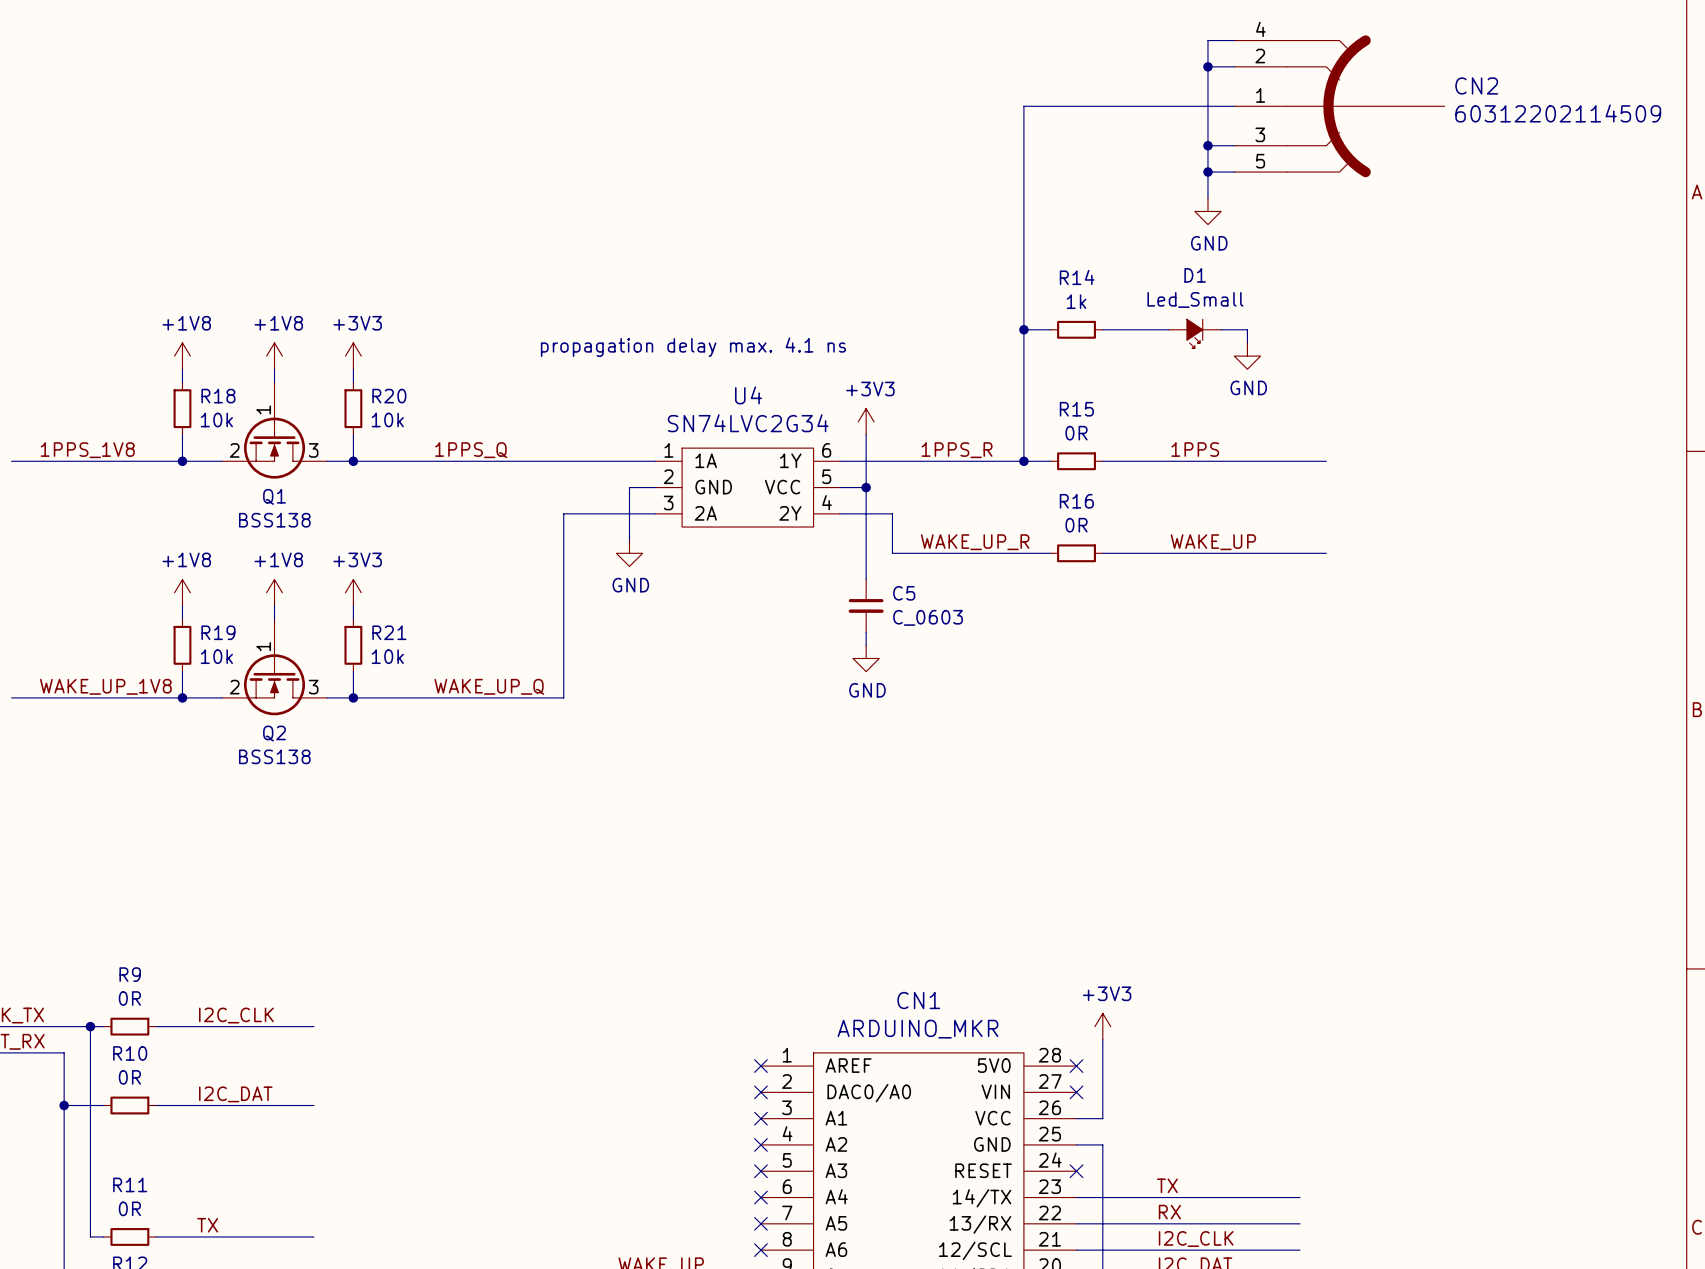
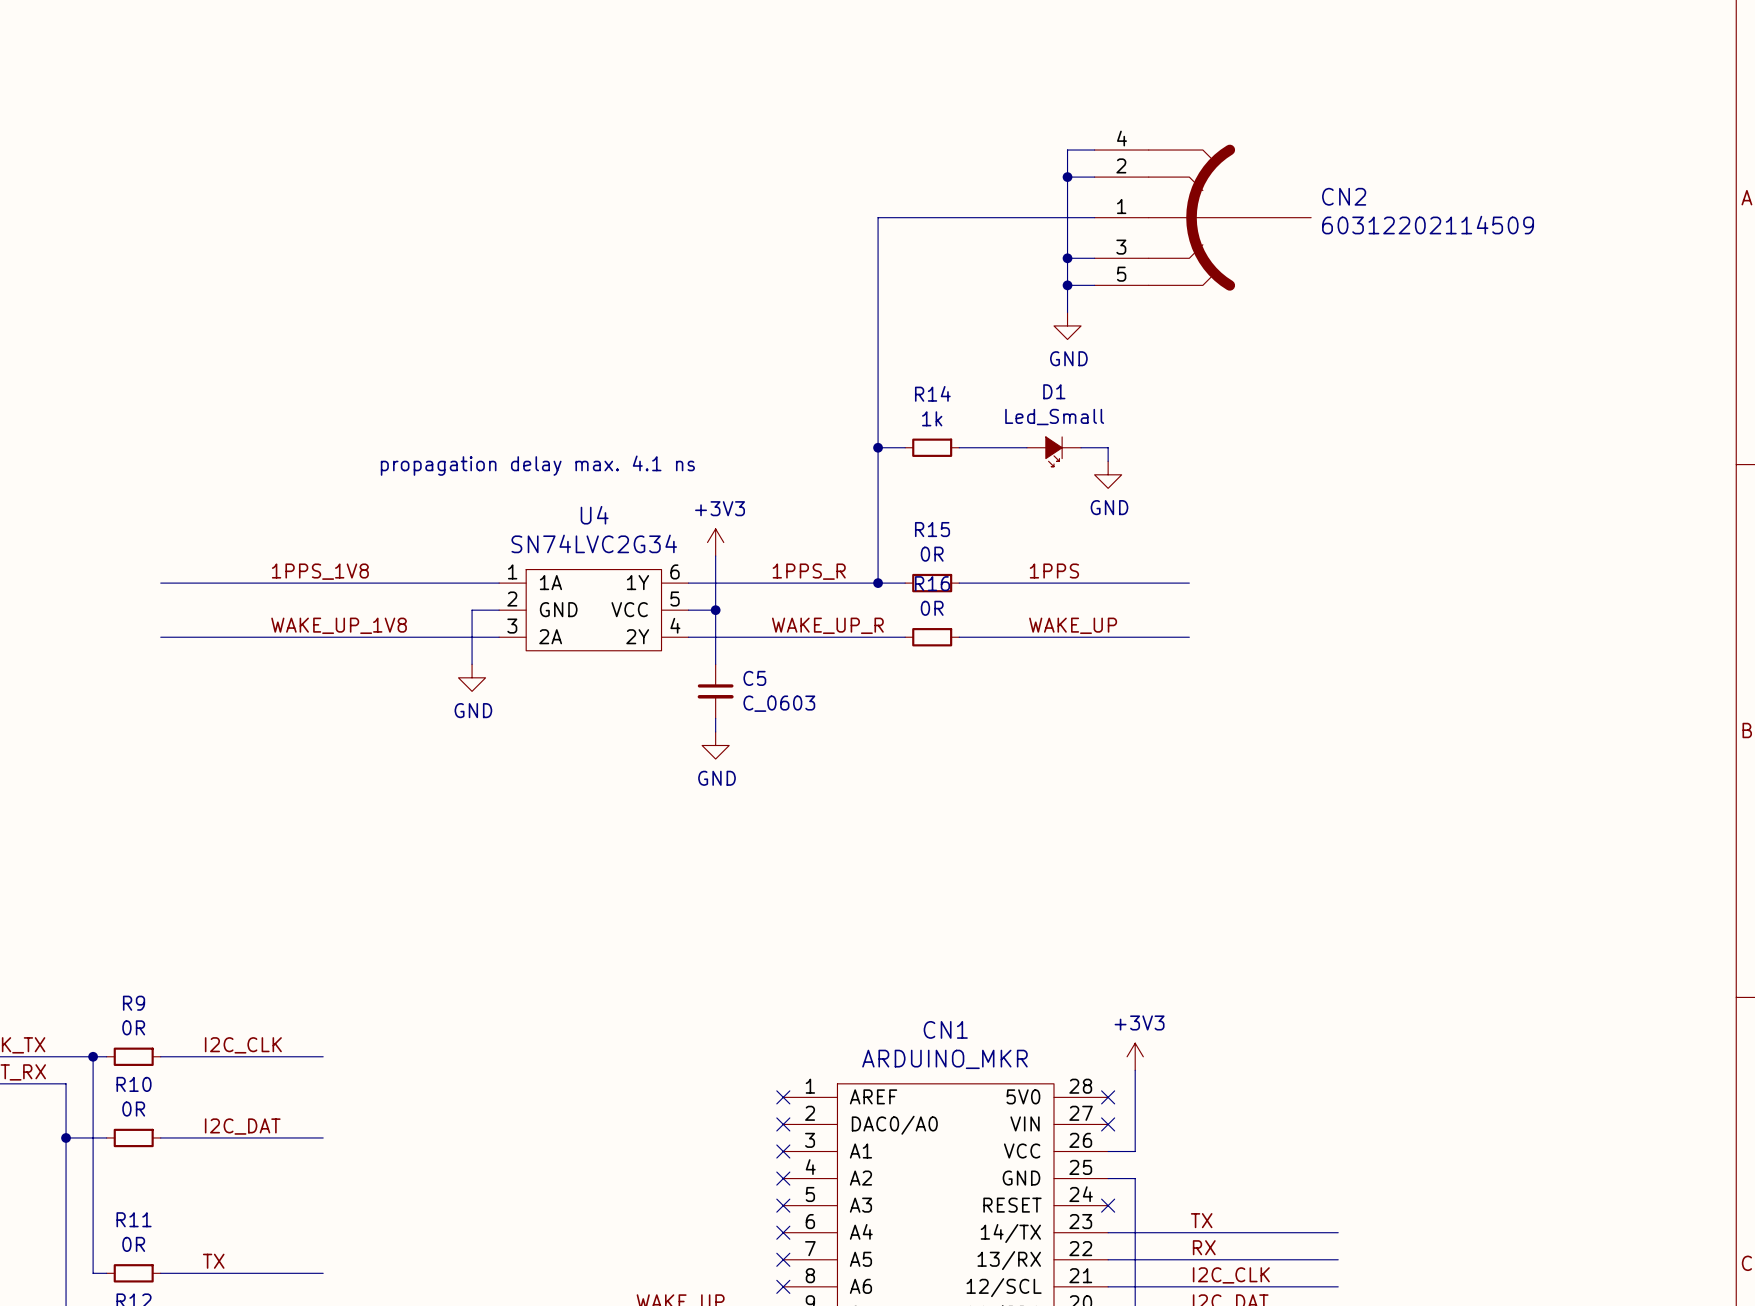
wire: (1234, 40) (1207, 40) (1207, 198) -> (1094, 150) (1067, 150) (1067, 312)
wire: (1207, 66) (1234, 66) -> (1067, 177) (1094, 177)
junction: (1207, 66) -> none
wire: (1234, 106) (1023, 106) (1023, 461) -> (1094, 217) (878, 217) (878, 583)
CN2 position: (1339, 106) -> (1202, 217)
wire: (1207, 145) (1234, 145) -> (1067, 258) (1094, 258)
junction: (1207, 145) -> none
junction: none -> (1067, 177)
wire: (1207, 172) (1234, 172) -> (1067, 285) (1094, 285)
junction: (1207, 172) -> none
power symbol: GND (1207, 211) -> none
junction: none -> (1067, 258)
junction: none -> (1067, 285)
power symbol: none -> GND (1067, 325)
wire: (1023, 329) (1050, 329) -> (878, 447) (905, 447)
junction: (1023, 329) -> none
R14 position: (1076, 329) -> (932, 447)
wire: (1102, 329) (1168, 329) -> (959, 447) (1026, 447)
wire: (1221, 329) (1247, 329) (1247, 342) -> (1081, 447) (1108, 447) (1108, 461)
D1 position: (1194, 333) -> (1054, 451)
text position: propagation delay max. 4.1 ns (693, 347) -> propagation delay max. 4.1 ns (537, 465)
power symbol: +1V8 (182, 356) -> none
power symbol: +1V8 (274, 356) -> none
power symbol: +3V3 (353, 356) -> none
power symbol: GND (1247, 356) -> none
wire: (182, 369) (182, 382) -> none
wire: (274, 369) (274, 382) -> none
wire: (353, 369) (353, 382) -> none
R18: 10k (182, 408) -> none
R20: 10k (353, 408) -> none
power symbol: +3V3 (866, 421) -> none
Q1: BSS138 (274, 430) -> none
wire: (182, 434) (182, 461) -> none
wire: (353, 434) (353, 461) -> none
junction: none -> (878, 447)
wire: (866, 434) (866, 579) -> none
label position: 1PPS (1195, 449) -> 1PPS (1054, 571)
label position: 1PPS_1V8 (87, 450) -> 1PPS_1V8 (320, 571)
label: 1PPS_Q (471, 450) -> none
label position: 1PPS_R (957, 450) -> 1PPS_R (809, 571)
wire: (11, 461) (221, 461) -> none
junction: (182, 461) -> none
wire: (327, 461) (655, 461) -> (160, 583) (499, 583)
junction: (353, 461) -> none
wire: (839, 461) (1050, 461) -> (688, 583) (905, 583)
junction: (1023, 461) -> none
R15 position: (1076, 461) -> (932, 583)
power symbol: none -> GND (1108, 474)
wire: (1102, 461) (1326, 461) -> (959, 583) (1189, 583)
wire: (655, 487) (629, 487) (629, 540) -> (499, 610) (472, 610) (472, 664)
U4 position: (747, 487) -> (593, 610)
wire: (839, 487) (866, 487) -> (688, 610) (715, 610)
junction: (866, 487) -> none
wire: (655, 513) (563, 513) (563, 697) (327, 697) -> none
wire: (839, 513) (892, 513) (892, 553) (1050, 553) -> none
power symbol: none -> +3V3 (715, 542)
wire: none -> (715, 556) (715, 664)
label position: WAKE_UP_R (975, 542) -> WAKE_UP_R (827, 625)
label position: WAKE_UP (1213, 542) -> WAKE_UP (1073, 625)
power symbol: GND (629, 553) -> none
R16 position: (1076, 553) -> (932, 637)
wire: (1102, 553) (1326, 553) -> (959, 637) (1189, 637)
junction: none -> (878, 583)
power symbol: +1V8 (182, 592) -> none
power symbol: +1V8 (274, 592) -> none
power symbol: +3V3 (353, 592) -> none
junction: none -> (715, 610)
wire: (182, 605) (182, 619) -> none
wire: (274, 605) (274, 619) -> none
wire: (353, 605) (353, 619) -> none
C5 position: (866, 605) -> (715, 691)
wire: none -> (160, 637) (499, 637)
wire: none -> (688, 637) (905, 637)
wire: (866, 632) (866, 645) -> (715, 718) (715, 731)
R19: 10k (182, 645) -> none
R21: 10k (353, 645) -> none
power symbol: none -> GND (472, 677)
power symbol: GND (866, 658) -> none
Q2: BSS138 (274, 667) -> none
wire: (182, 671) (182, 697) -> none
wire: (353, 671) (353, 697) -> none
label position: WAKE_UP_1V8 (105, 686) -> WAKE_UP_1V8 (339, 625)
label: WAKE_UP_Q (489, 686) -> none
wire: (11, 697) (221, 697) -> none
junction: (182, 697) -> none
junction: (353, 697) -> none
power symbol: none -> GND (715, 745)

